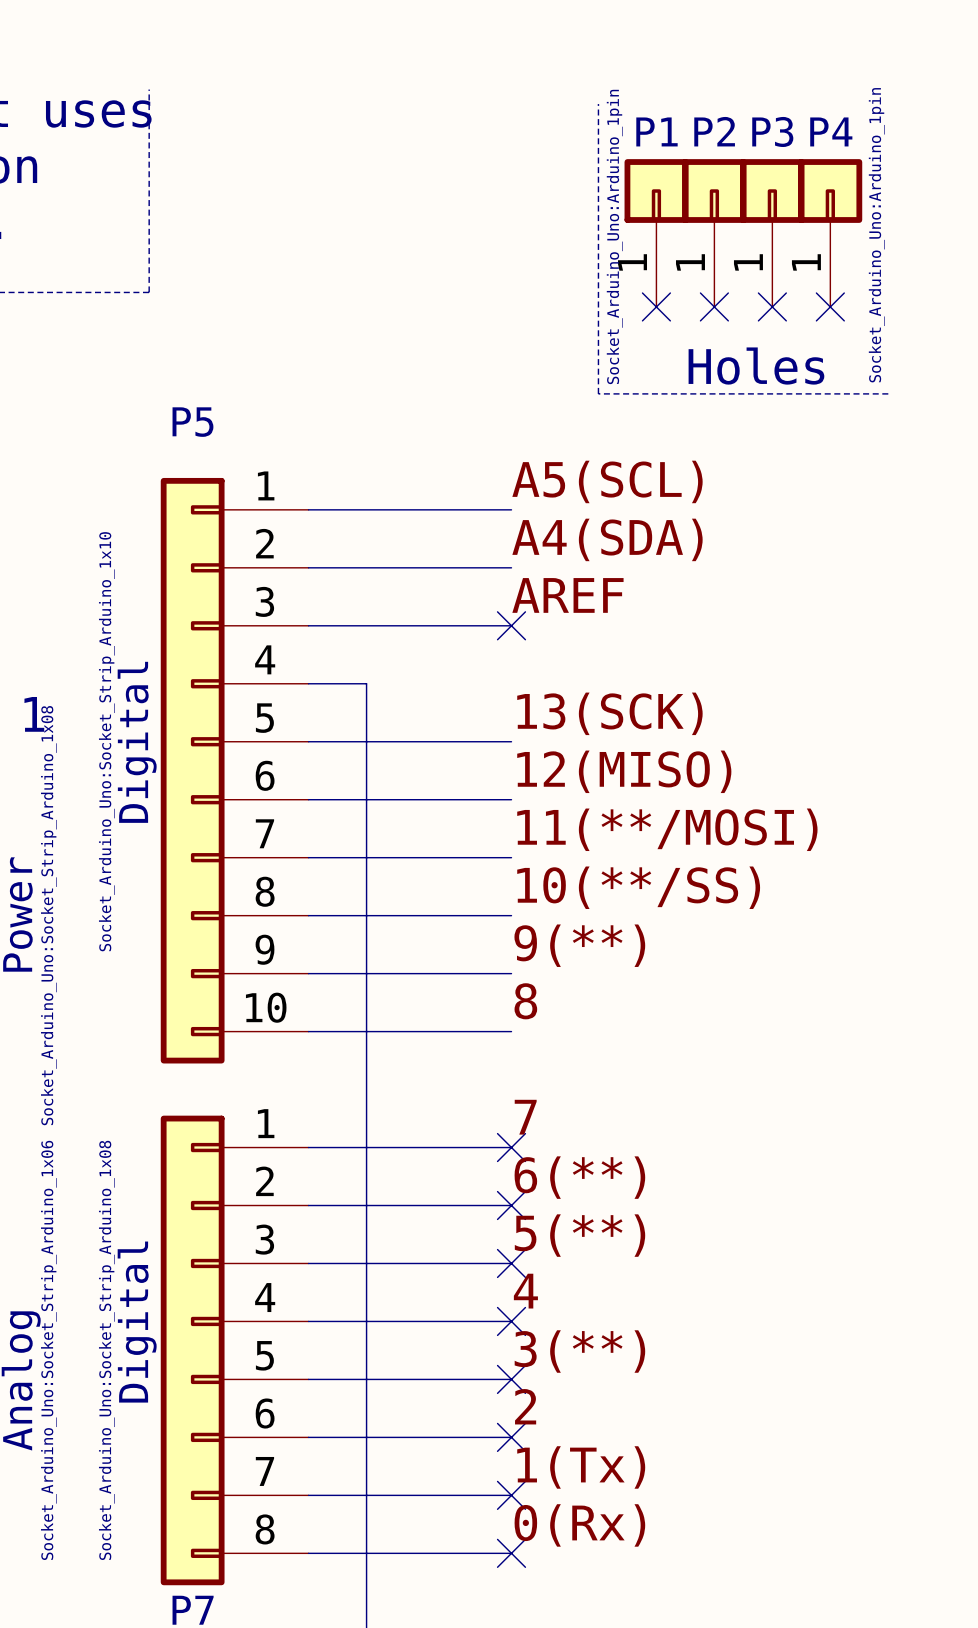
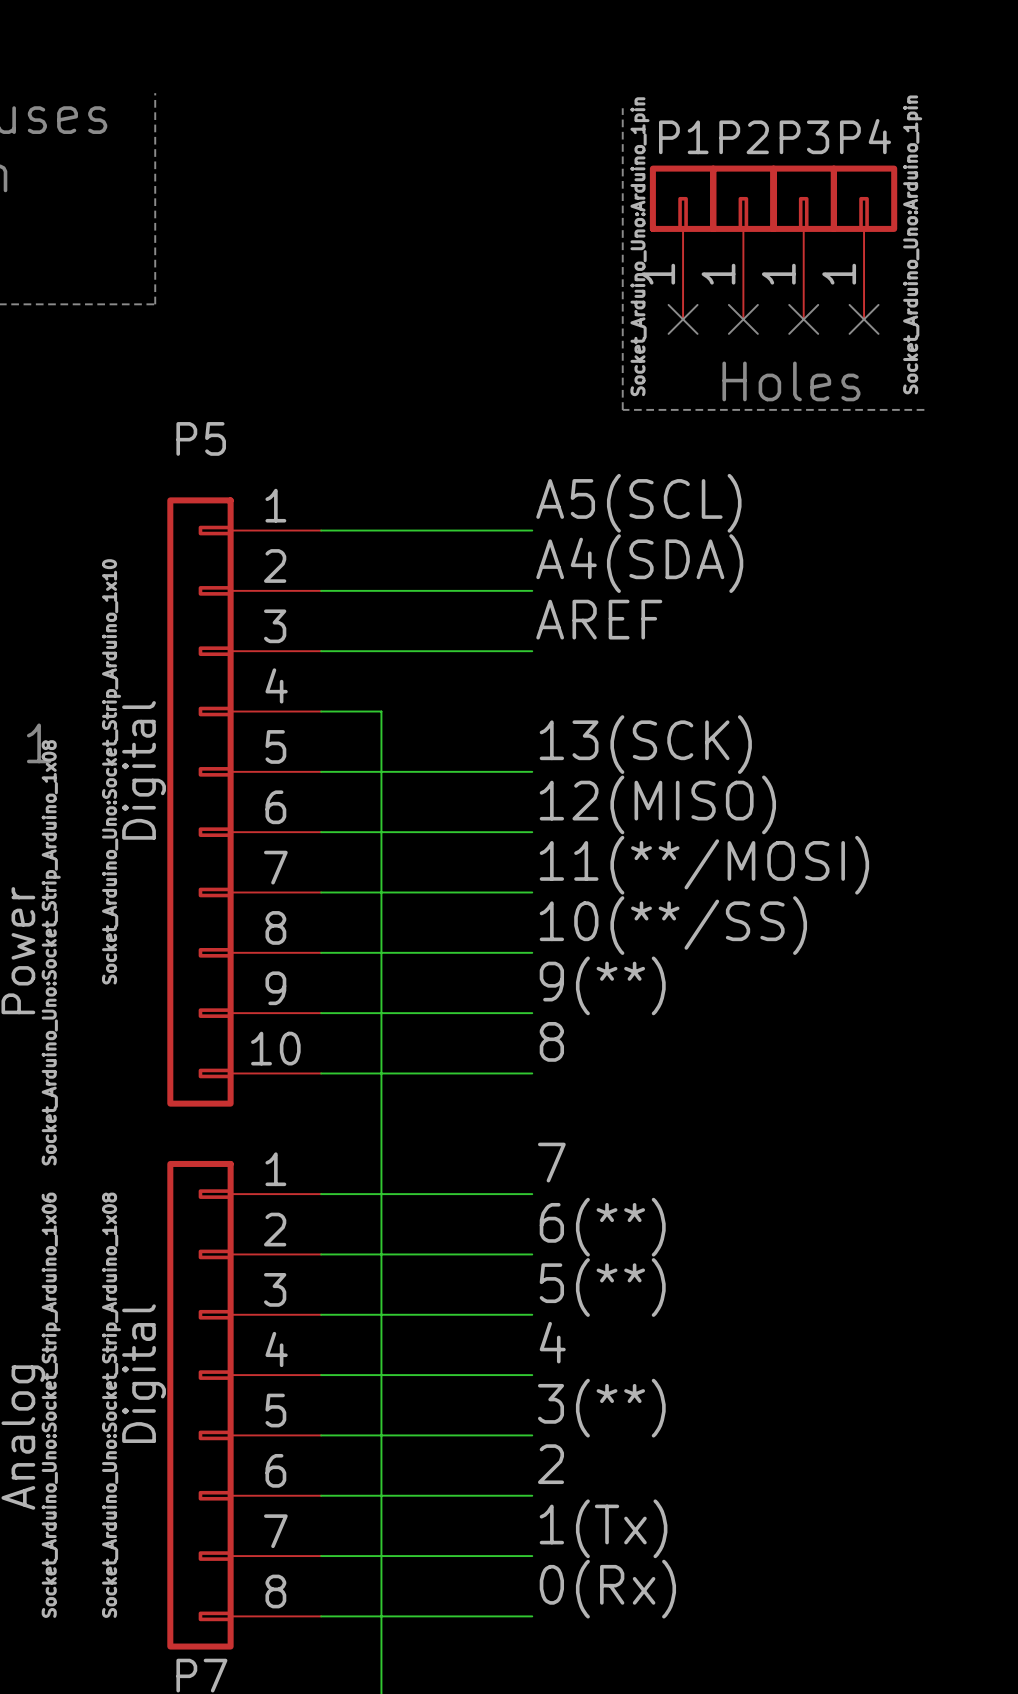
no-connect mark: (511, 625) -> none
no-connect mark: (511, 1147) -> none
no-connect mark: (511, 1205) -> none
no-connect mark: (511, 1263) -> none
no-connect mark: (511, 1321) -> none
no-connect mark: (511, 1379) -> none
no-connect mark: (511, 1437) -> none
no-connect mark: (511, 1495) -> none
no-connect mark: (511, 1553) -> none

